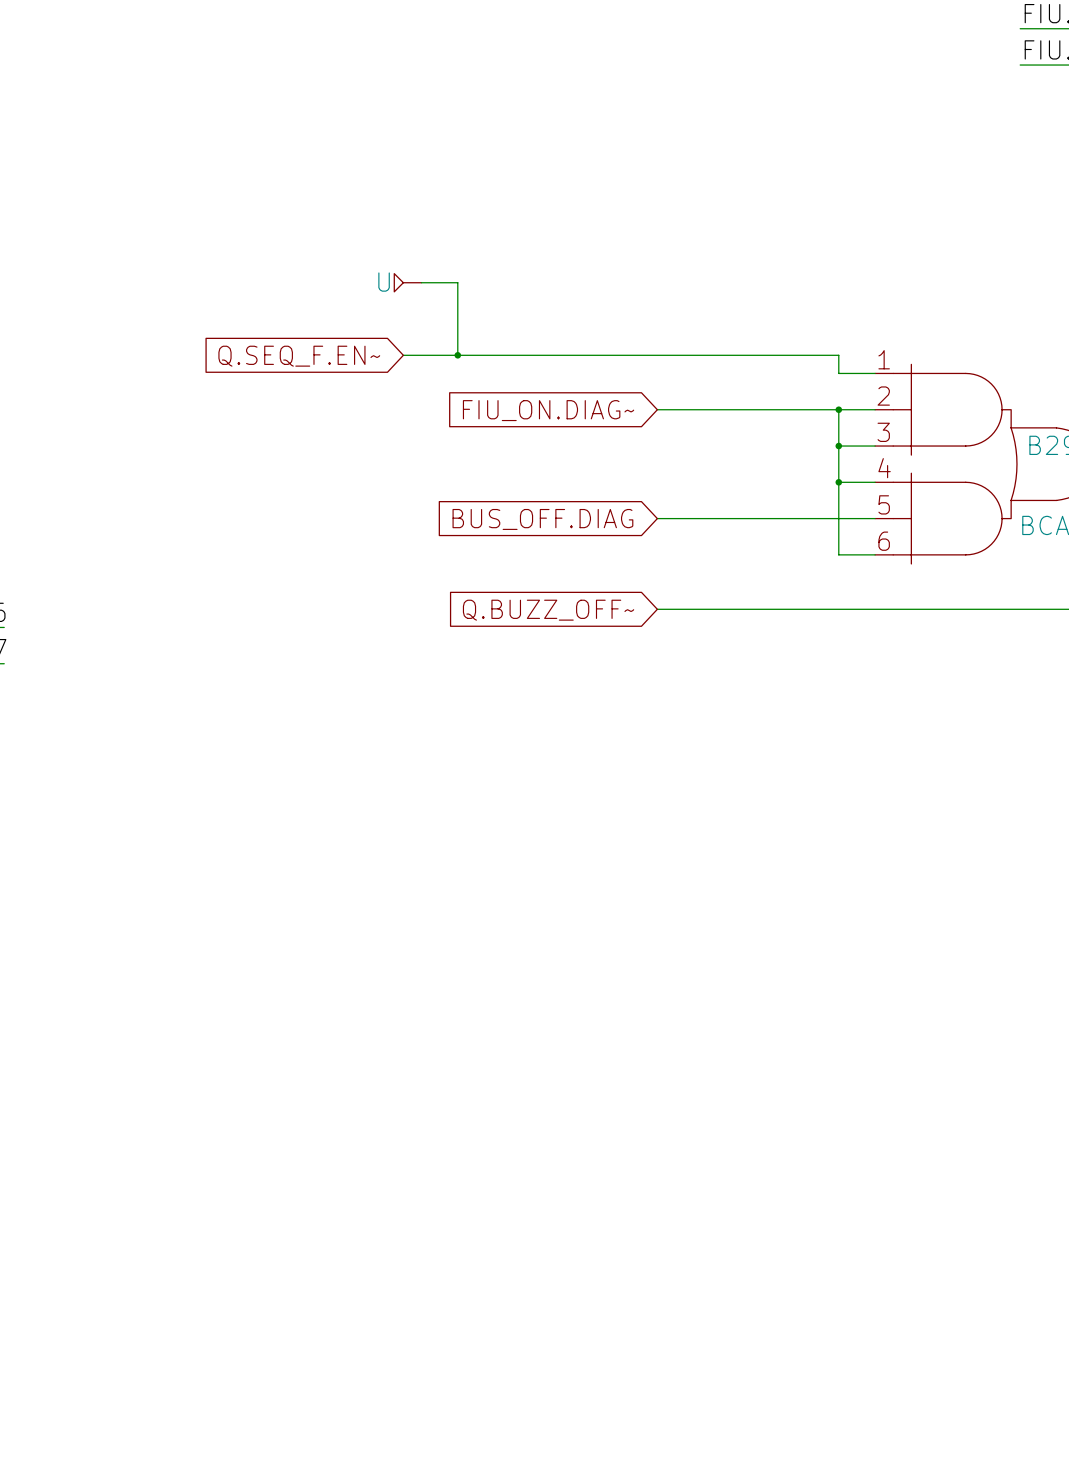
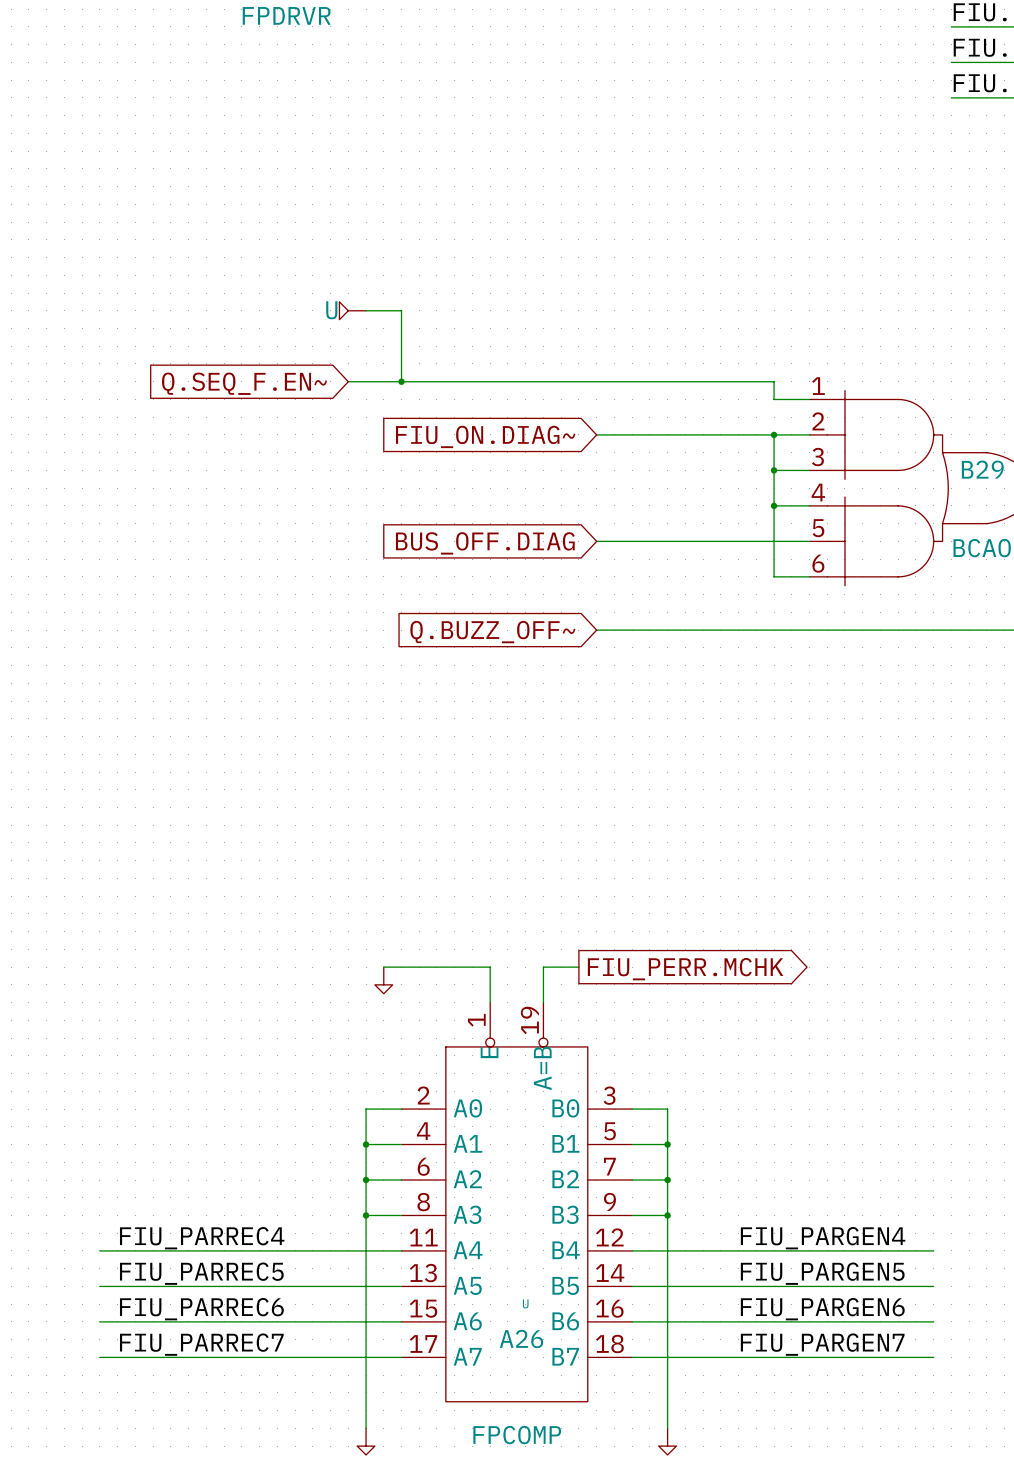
wire: none -> (383, 967) (490, 967) (490, 1002)
wire: none -> (578, 967) (543, 967) (543, 1002)
global label: none -> FIU_PERR.MCHK (685, 969)
power symbol: none -> (383, 980)
wire: none -> (401, 1109) (366, 1109) (366, 1428)
wire: none -> (632, 1109) (667, 1109) (667, 1428)
wire: none -> (366, 1144) (401, 1144)
junction: none -> (366, 1144)
wire: none -> (632, 1144) (667, 1144)
junction: none -> (667, 1144)
wire: none -> (366, 1180) (401, 1180)
junction: none -> (366, 1180)
wire: none -> (632, 1180) (667, 1180)
junction: none -> (667, 1180)
U: none -> (516, 1202)
wire: none -> (366, 1215) (401, 1215)
junction: none -> (366, 1215)
wire: none -> (632, 1215) (667, 1215)
junction: none -> (667, 1215)
label: none -> FIU_PARREC4 (202, 1238)
label: none -> FIU_PARGEN4 (823, 1238)
wire: none -> (99, 1250) (401, 1250)
wire: none -> (632, 1250) (933, 1250)
label: none -> FIU_PARREC5 (201, 1273)
label: none -> FIU_PARGEN5 (822, 1273)
wire: none -> (99, 1286) (401, 1286)
wire: none -> (632, 1286) (933, 1286)
label: none -> FIU_PARREC6 (201, 1309)
label: none -> FIU_PARGEN6 (822, 1309)
wire: none -> (99, 1321) (401, 1321)
wire: none -> (632, 1321) (933, 1321)
label: none -> FIU_PARREC7 (201, 1344)
label: none -> FIU_PARGEN7 (822, 1344)
wire: none -> (99, 1357) (401, 1357)
wire: none -> (632, 1357) (933, 1357)
power symbol: none -> (366, 1441)
power symbol: none -> (667, 1441)

